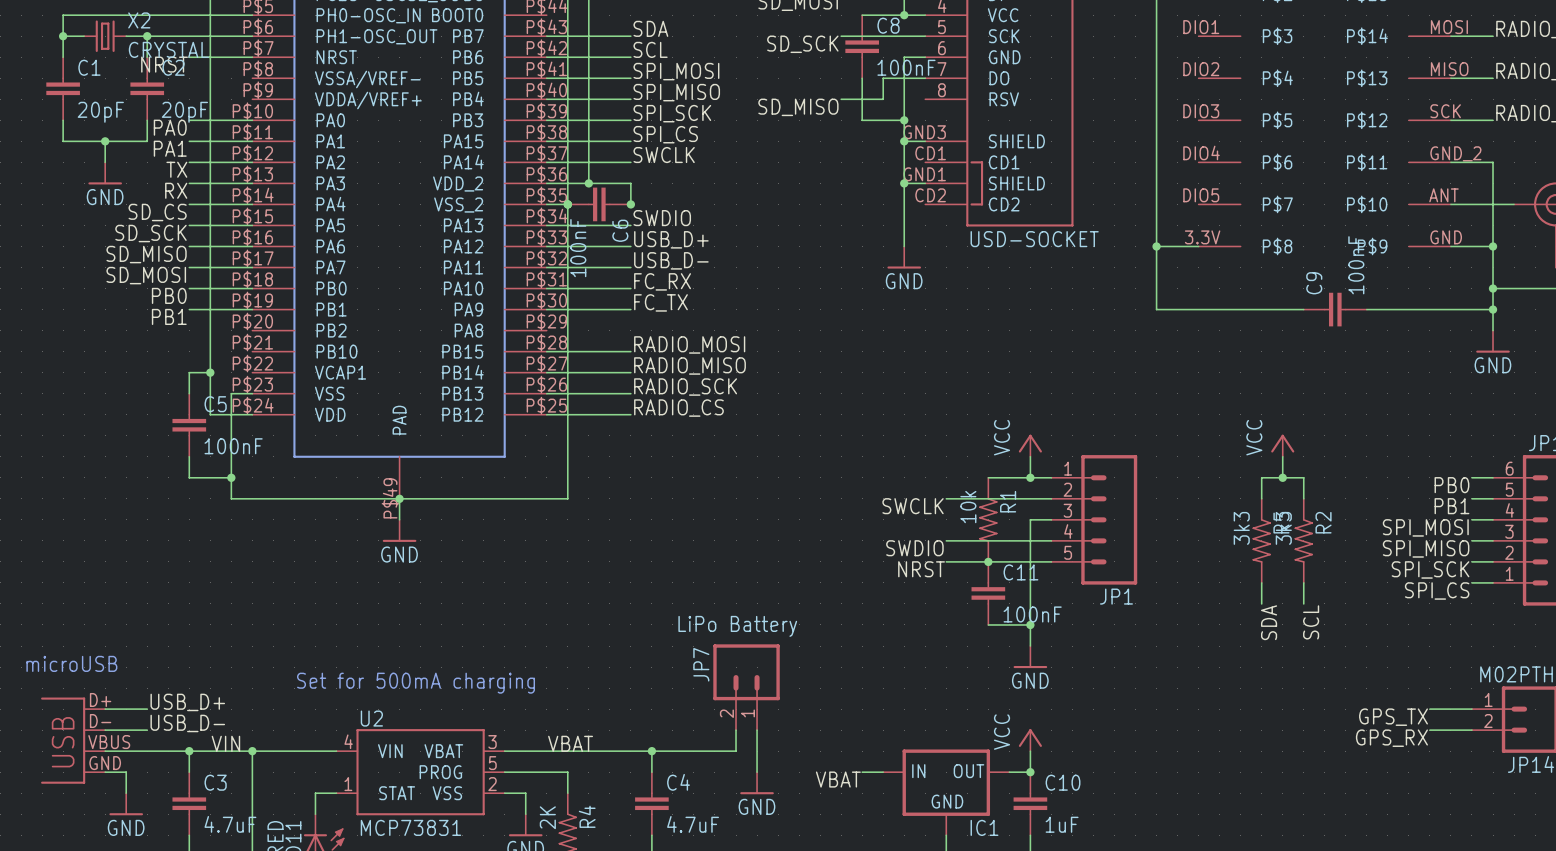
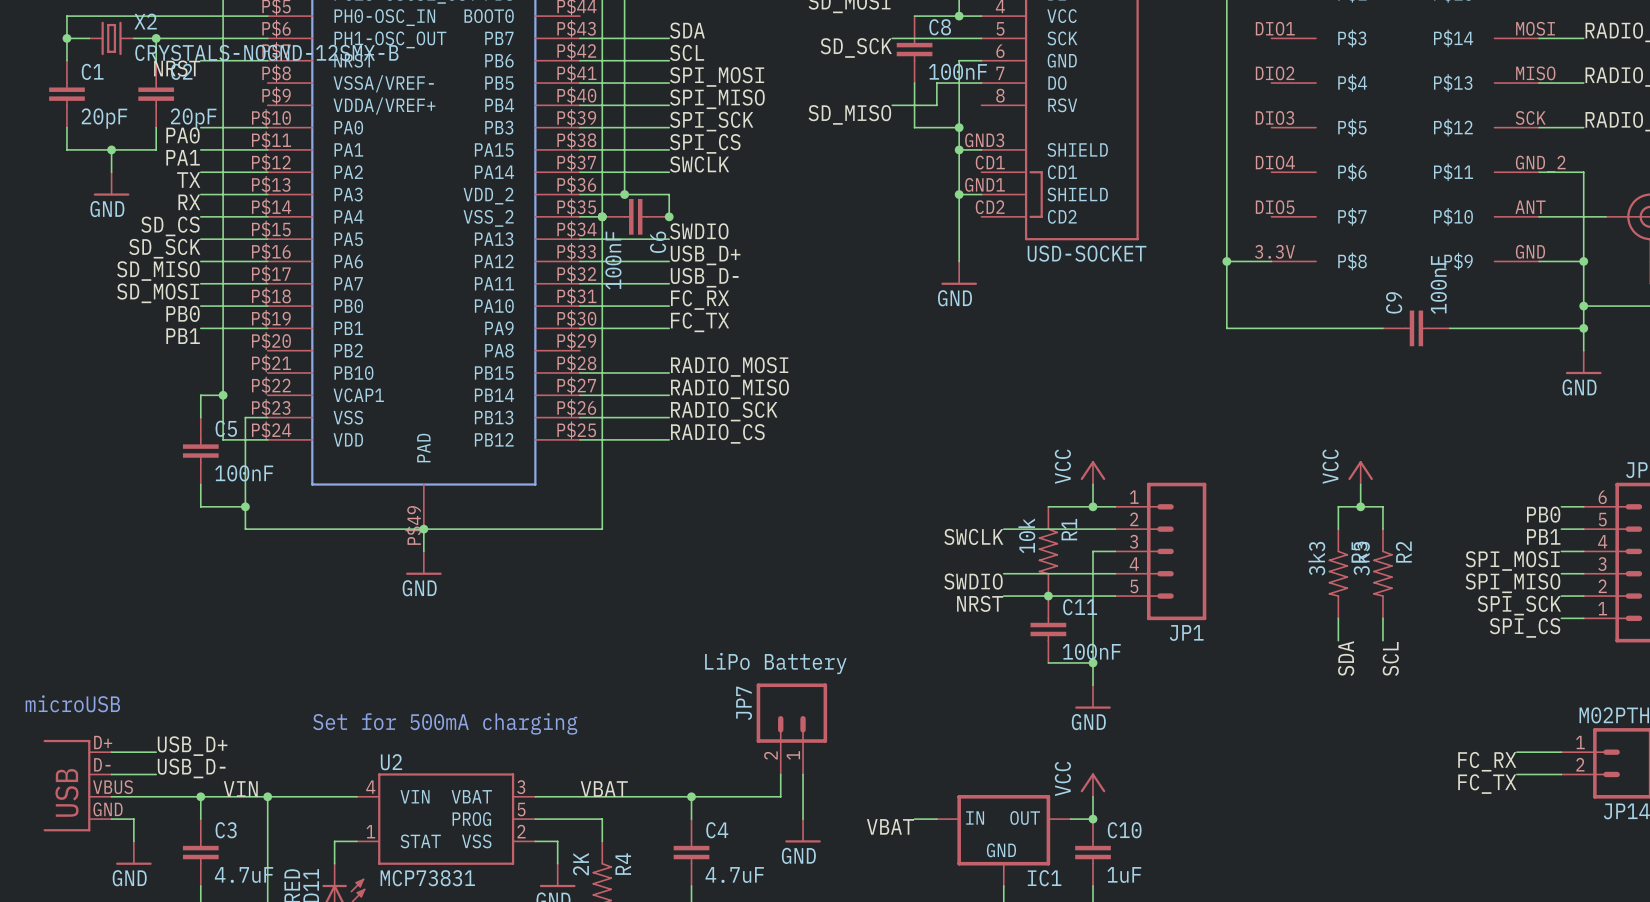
X2 value: CRYSTAL (168, 49) -> CRYSTALS-NOGND-12SMX-B (266, 52)
label: GPS_TX (1393, 717) -> FC_RX (1487, 761)
label: GPS_RX (1391, 738) -> FC_TX (1487, 784)

